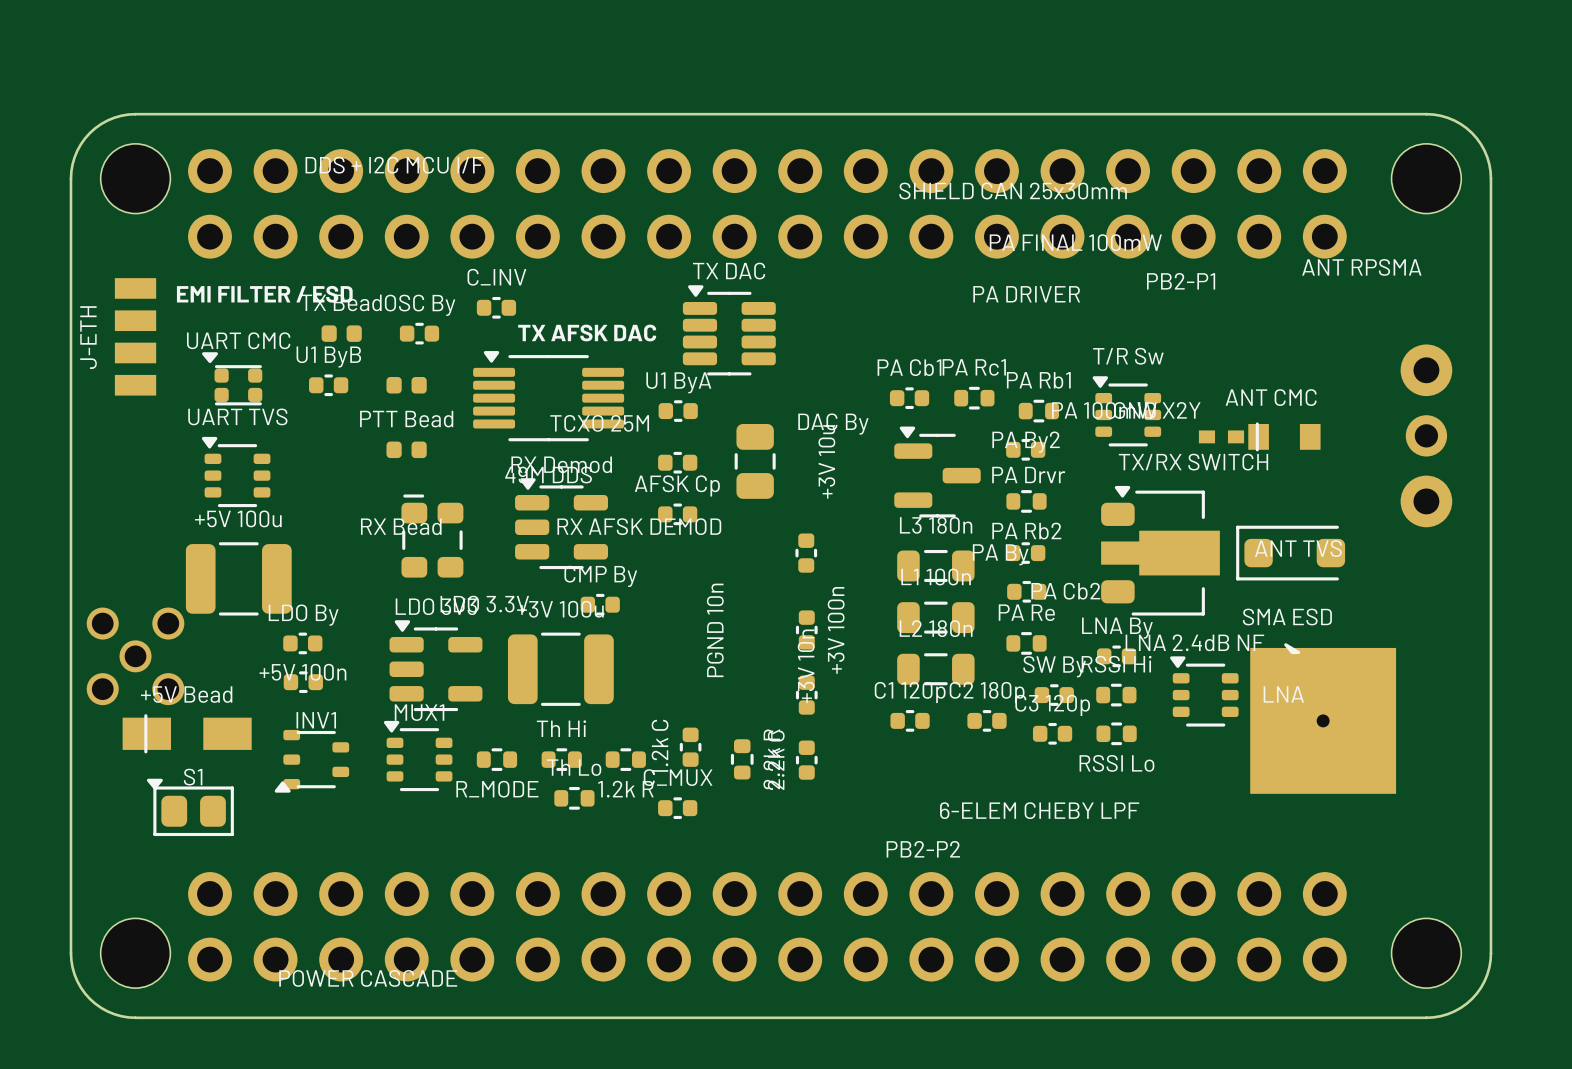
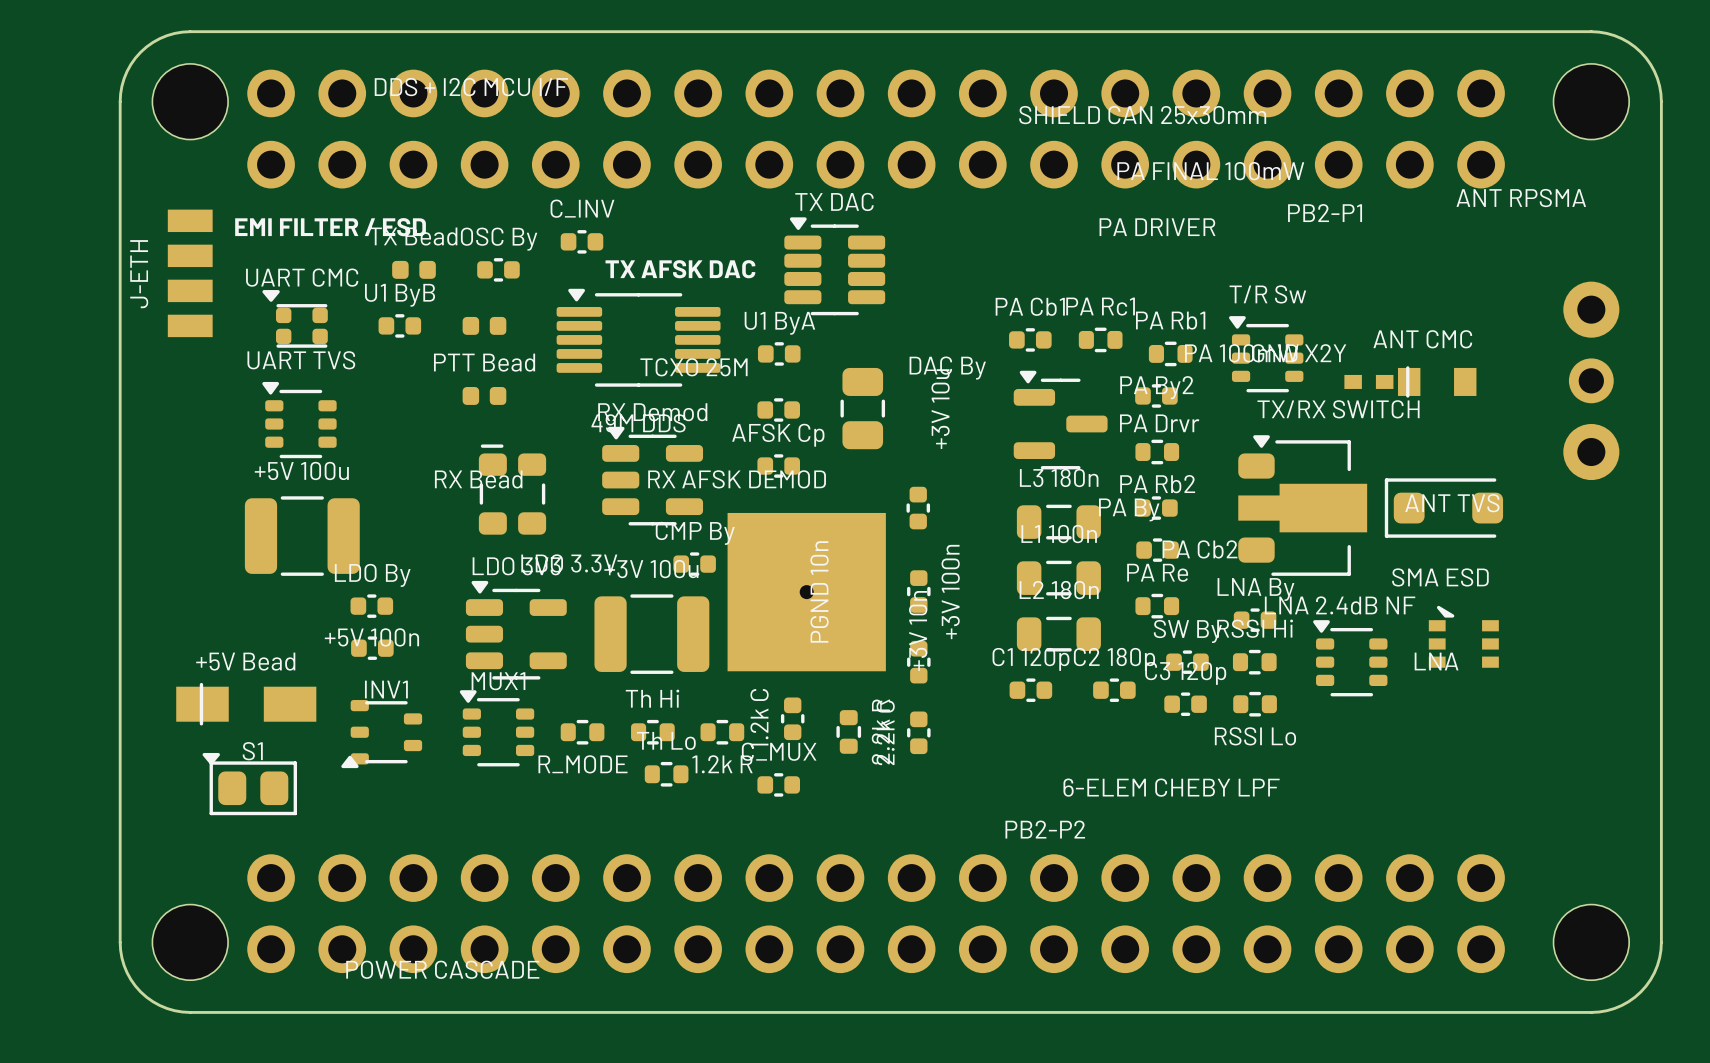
part: (135, 656) -> none
part position: (1323, 720) -> (806, 592)

